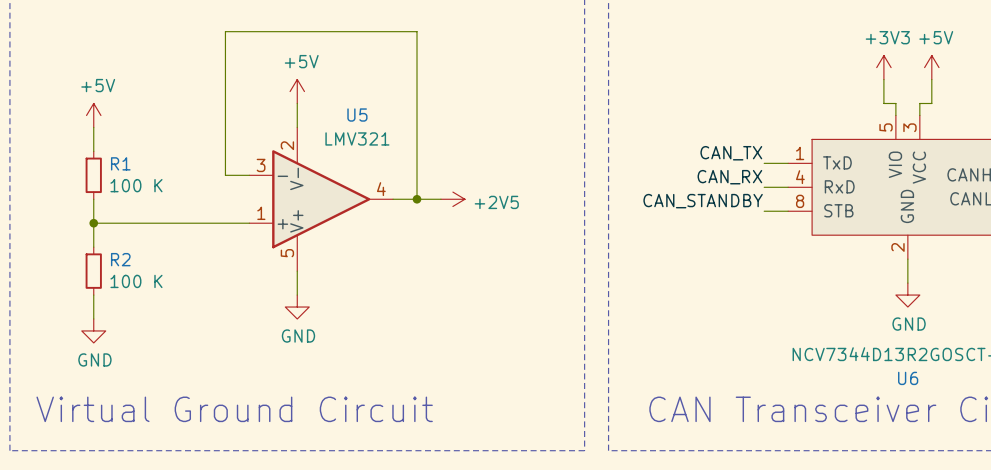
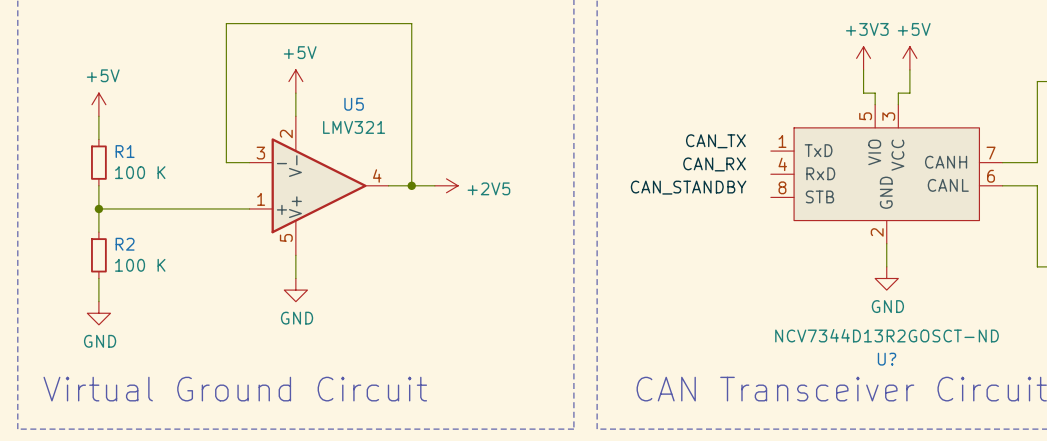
wire: (764, 163) (788, 163) -> none
wire: (764, 187) (788, 187) -> none
wire: (764, 211) (788, 211) -> none
U6 name: U6 (908, 378) -> U? (887, 359)

